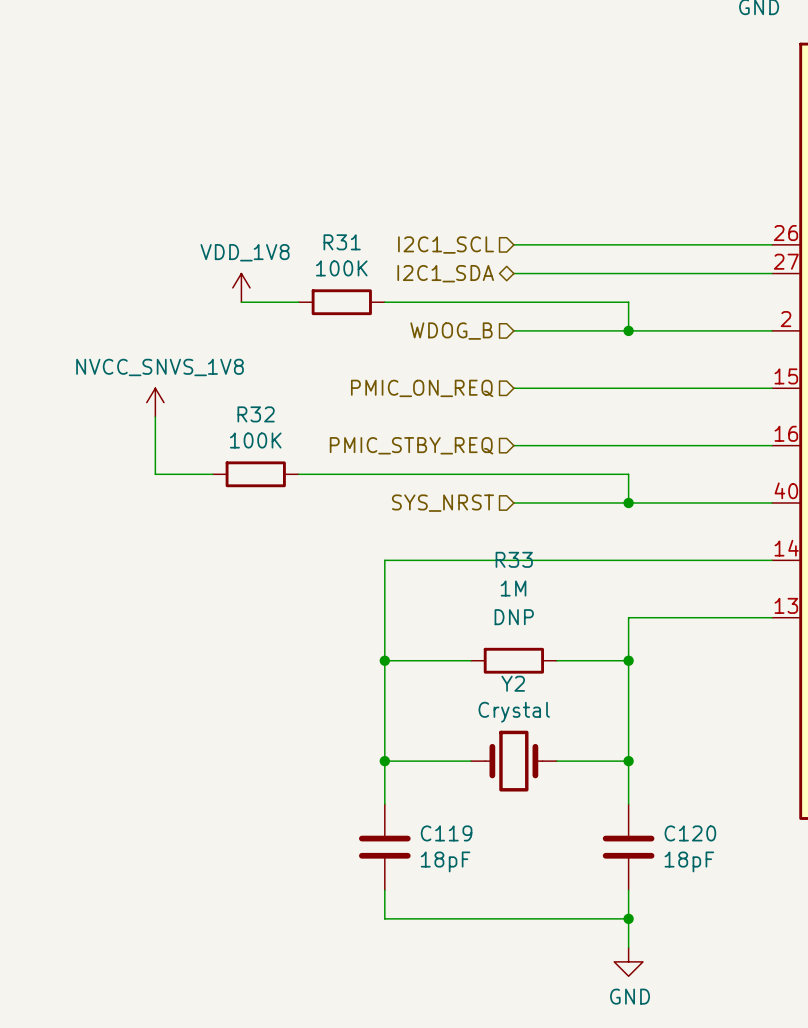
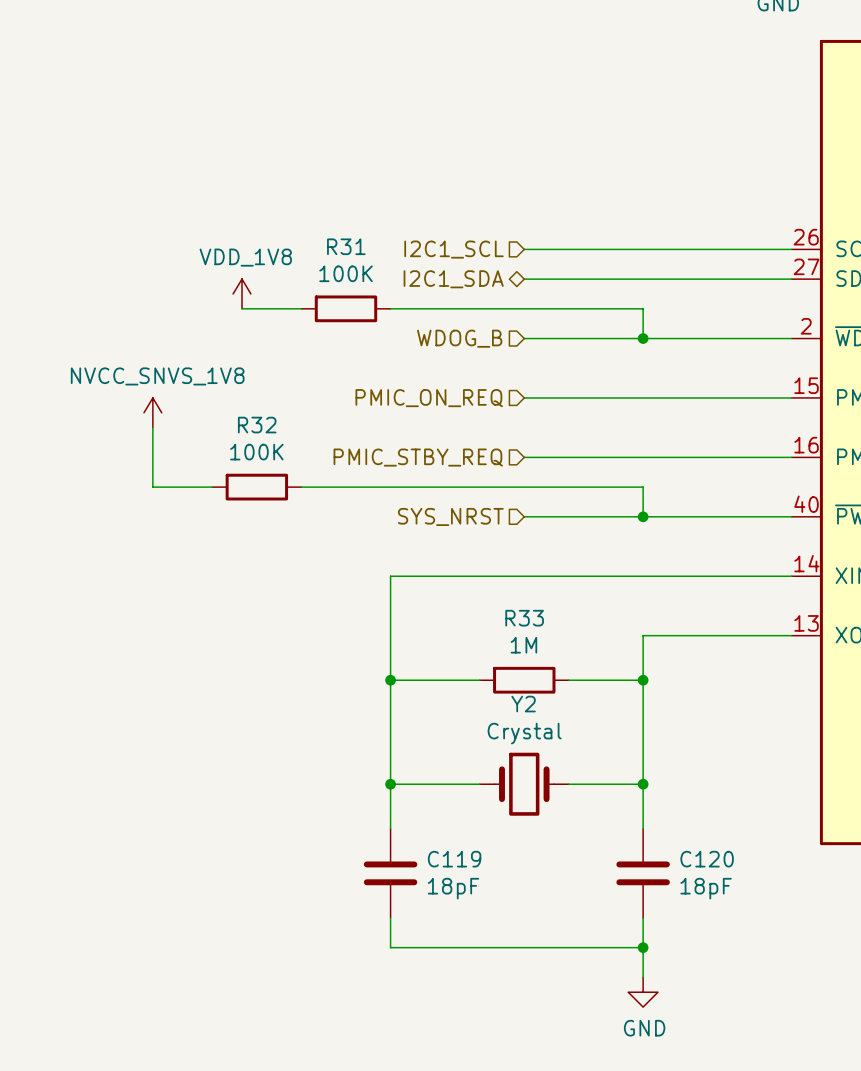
R33 name position: R33 (514, 559) -> R33 (524, 618)
R33 value position: 1M (513, 588) -> 1M (523, 645)
R33 text: DNP (514, 617) -> none

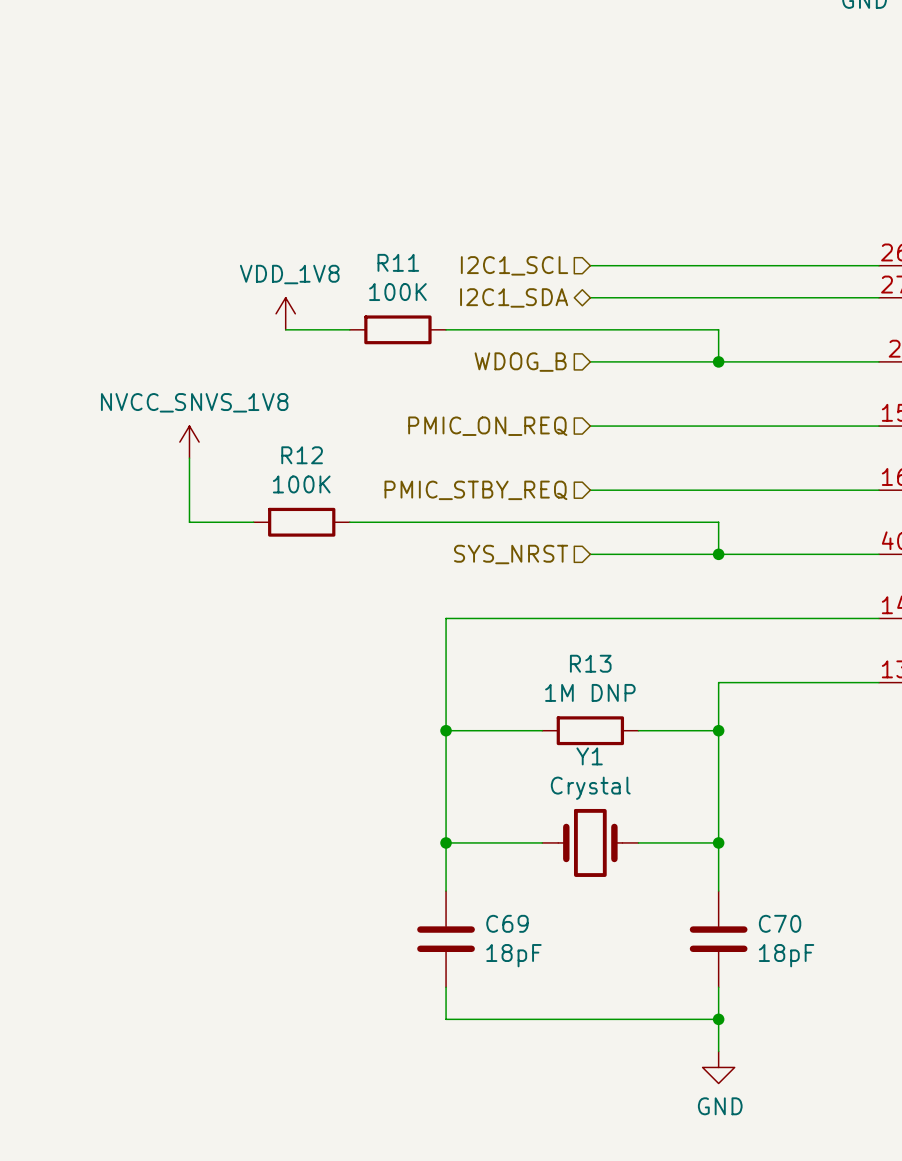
R31 name: R31 (346, 246) -> R11 (398, 262)
R32 name: R32 (257, 425) -> R12 (302, 455)
R33 name: R33 (524, 618) -> R13 (590, 663)
R33 value: 1M (523, 645) -> 1M DNP (590, 692)
Y2 name: Y2 (523, 704) -> Y1 (589, 756)
C119 name: C119 (454, 859) -> C69 (507, 923)
C120 name: C120 (707, 859) -> C70 (780, 923)

